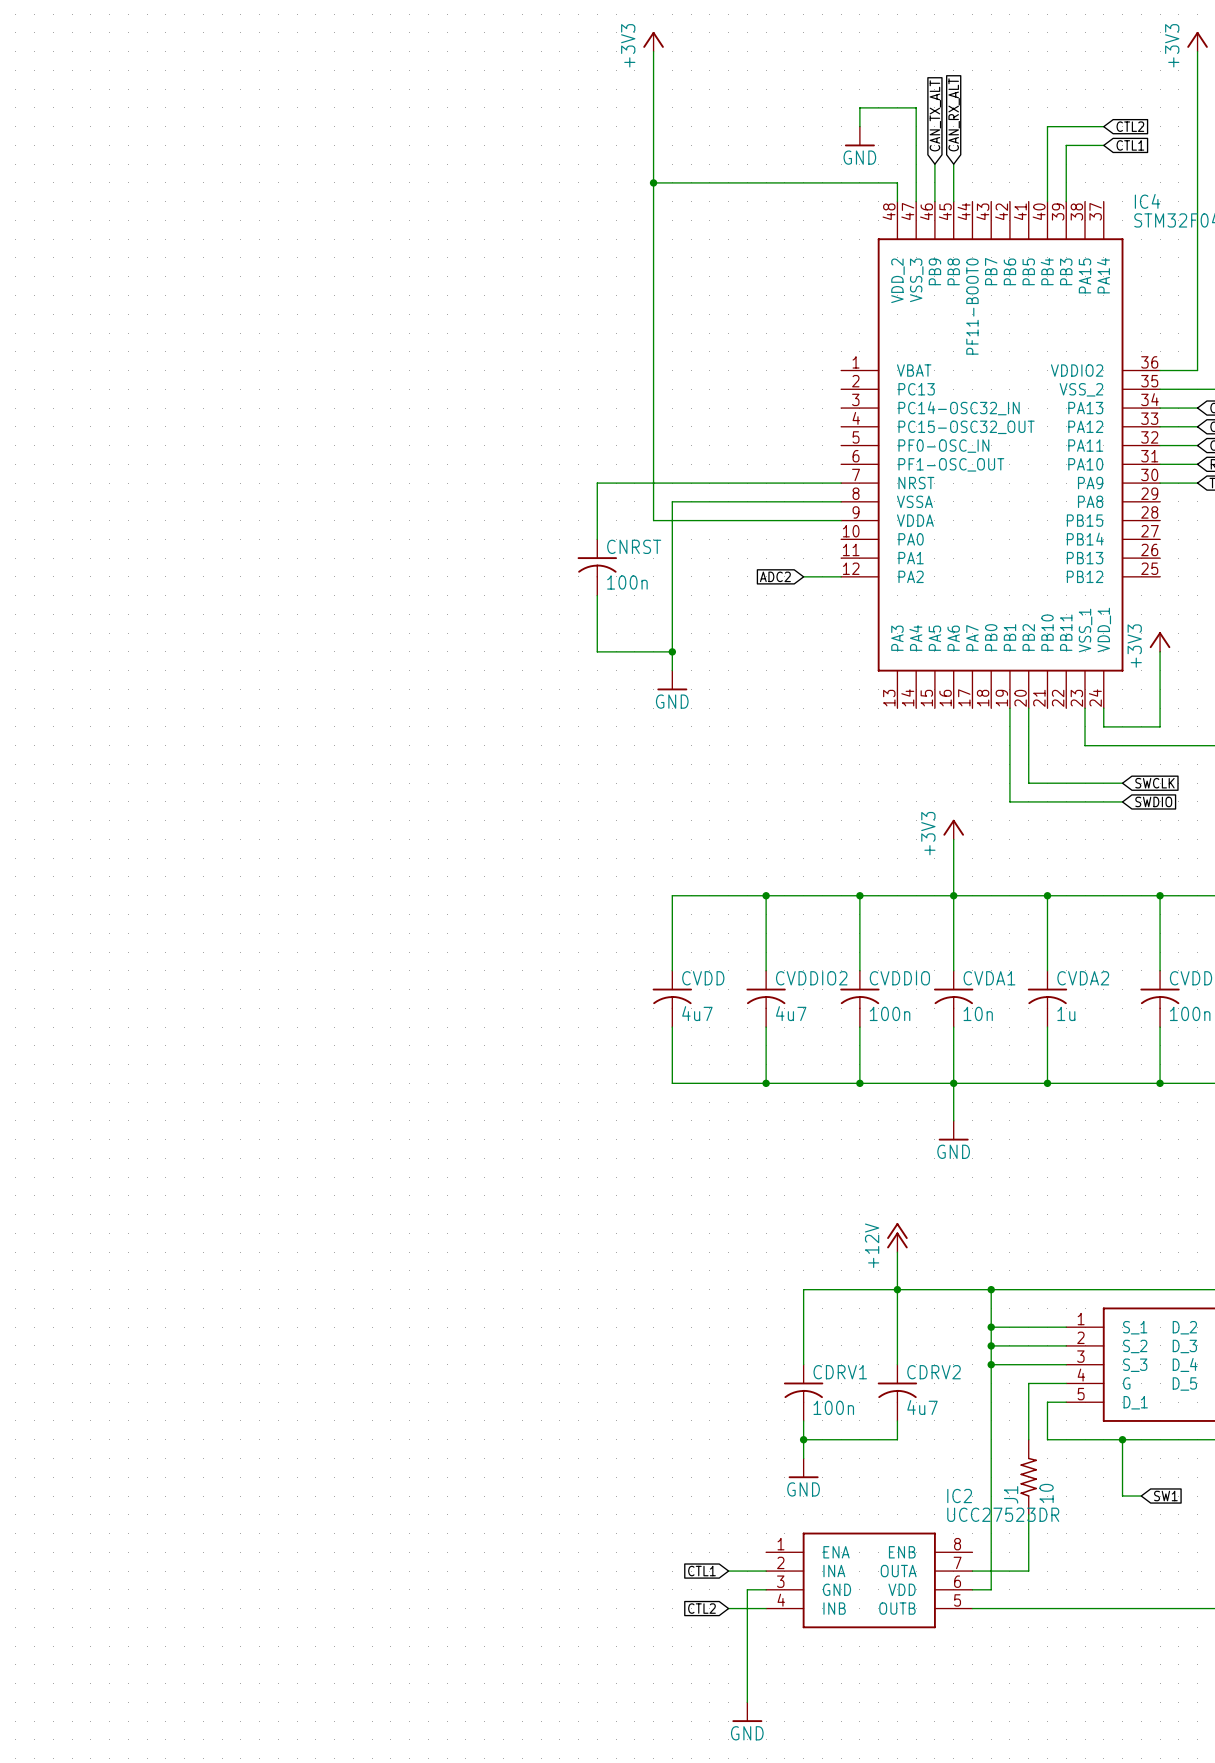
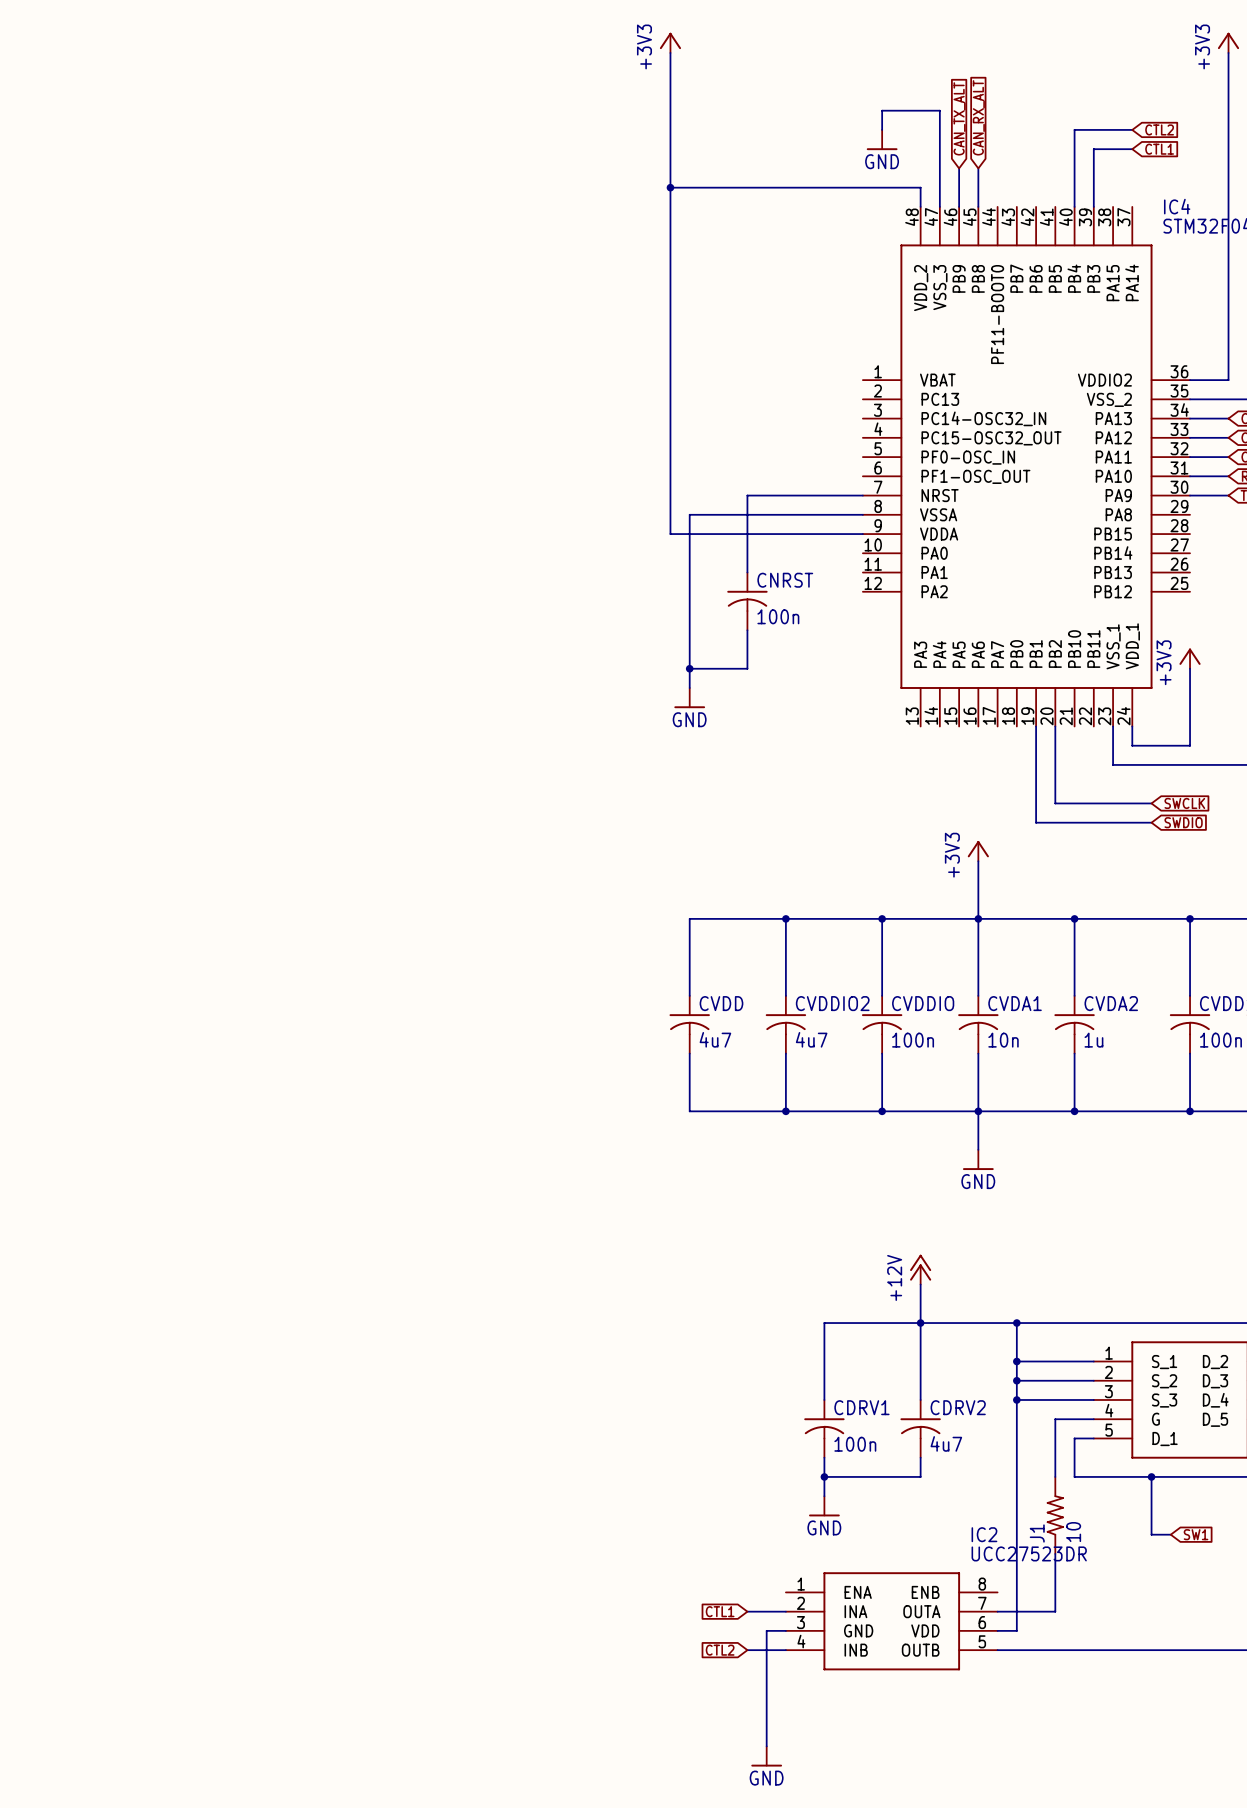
wire: (728, 483) (597, 483) (597, 539) -> (747, 495) (747, 572)
CNRST position: (597, 567) -> (747, 601)
global label: ADC2 (775, 576) -> none
wire: (803, 576) (841, 576) -> none
wire: (597, 595) (597, 651) (672, 651) -> (747, 630) (747, 668) (689, 668)

